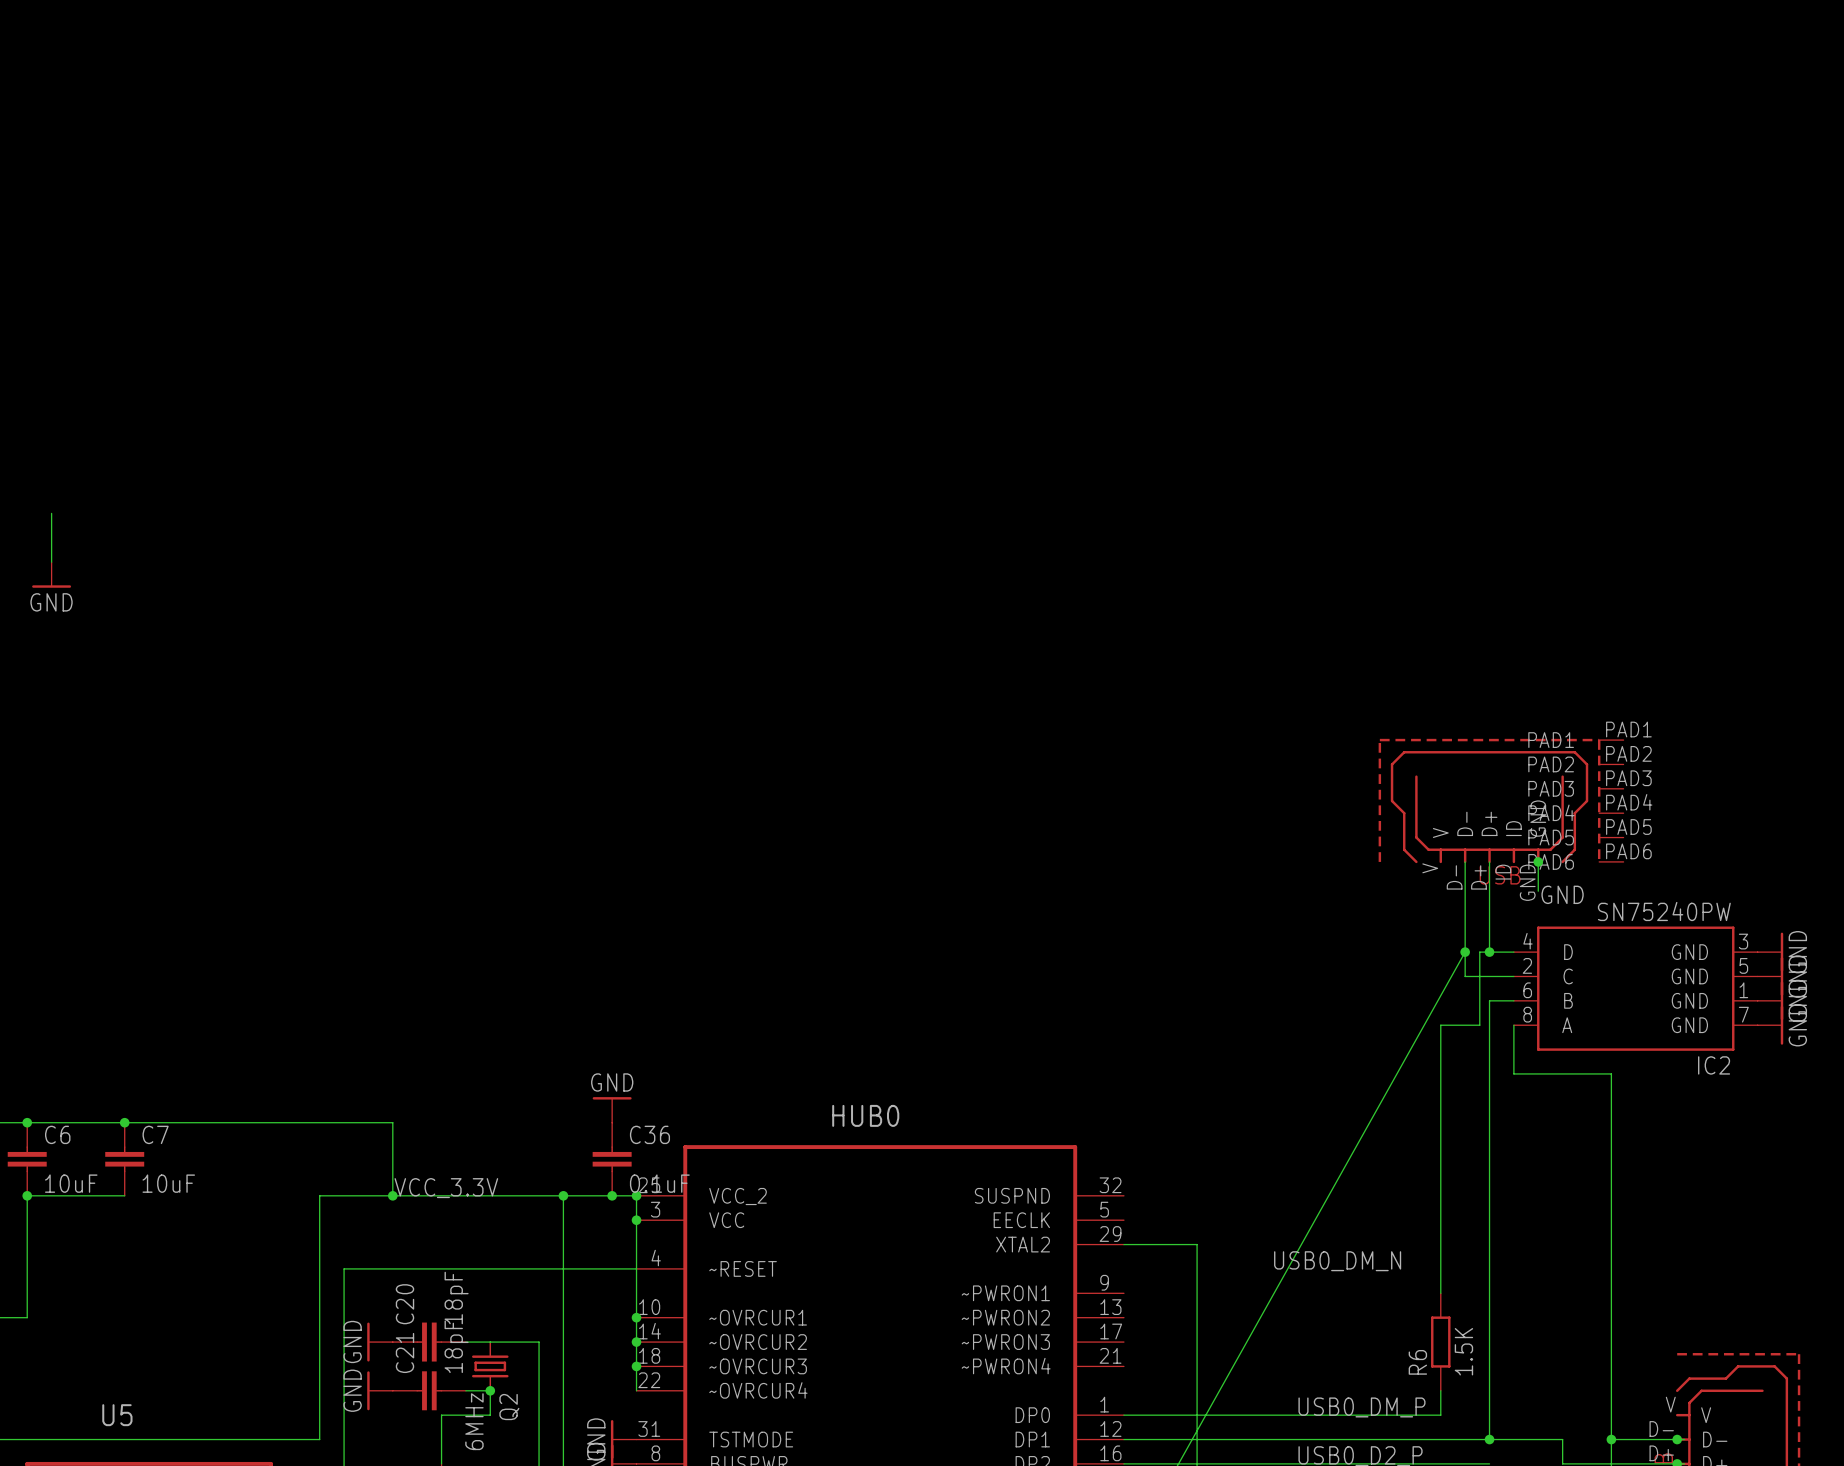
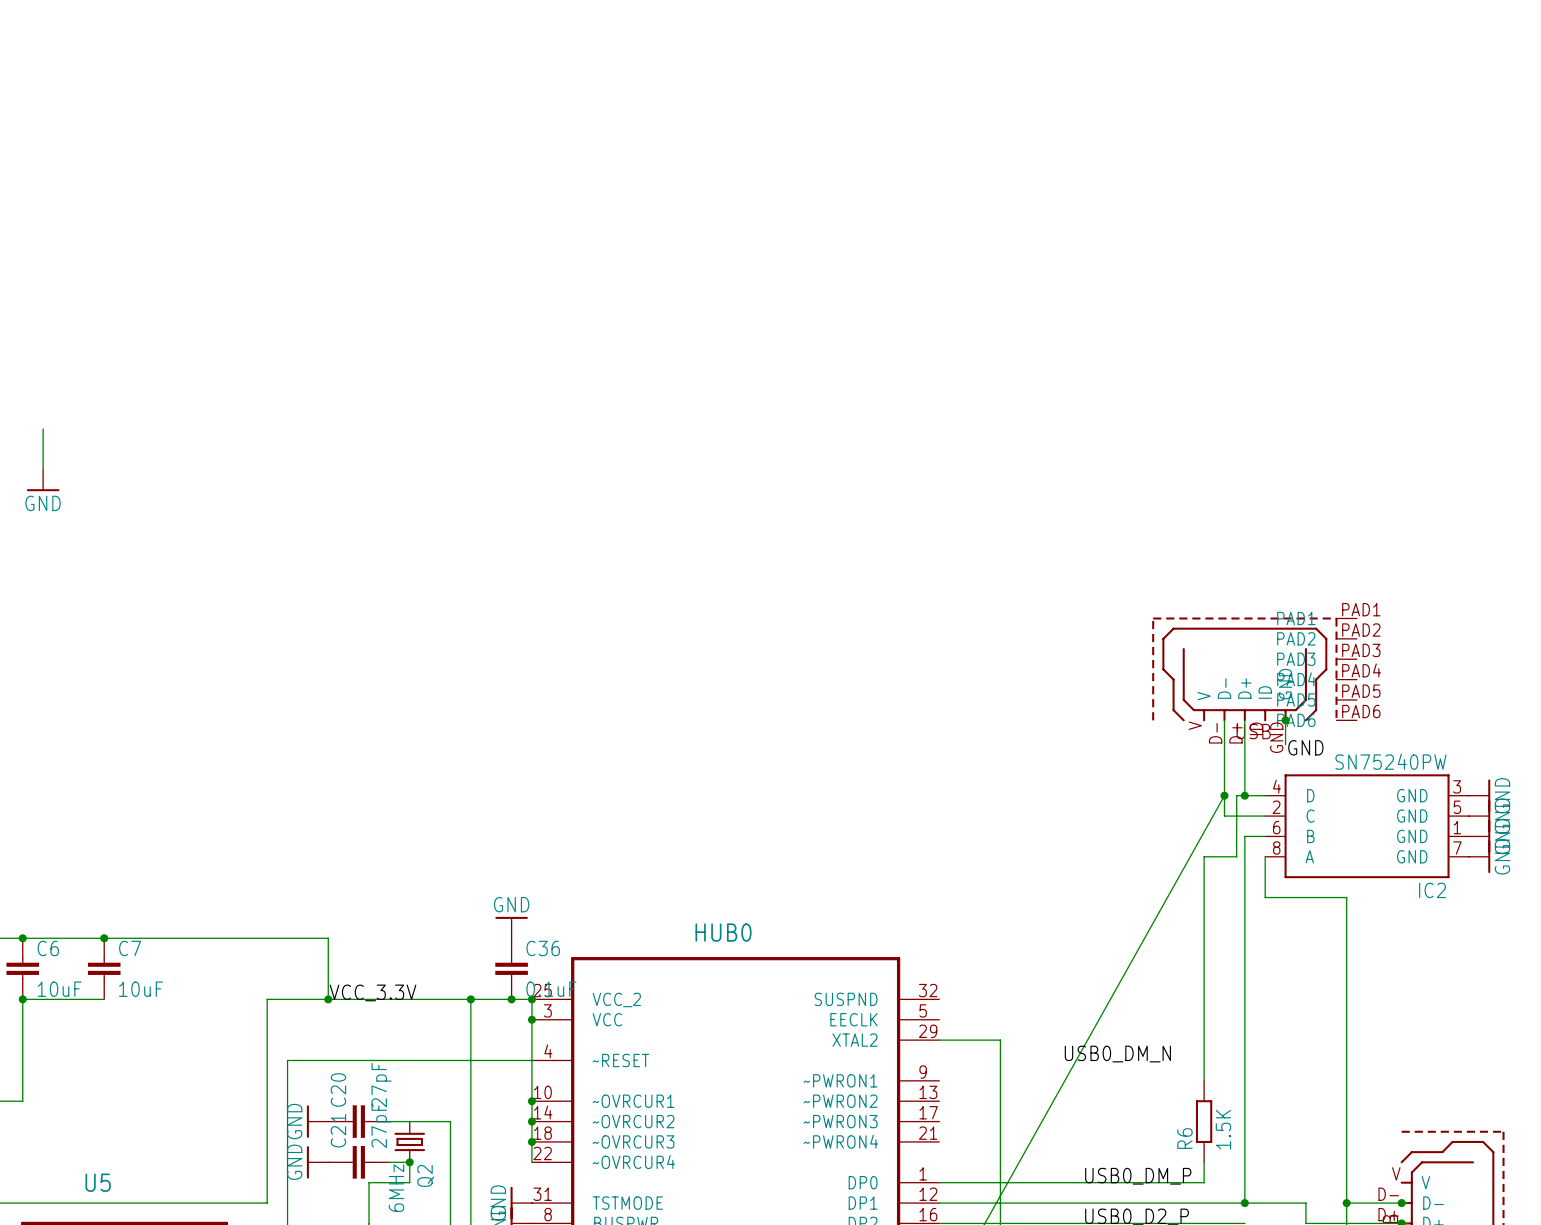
C20 value: 18pF (456, 1298) -> 27pF (381, 1085)
C21 value: 18pF (456, 1346) -> 27pF (381, 1125)

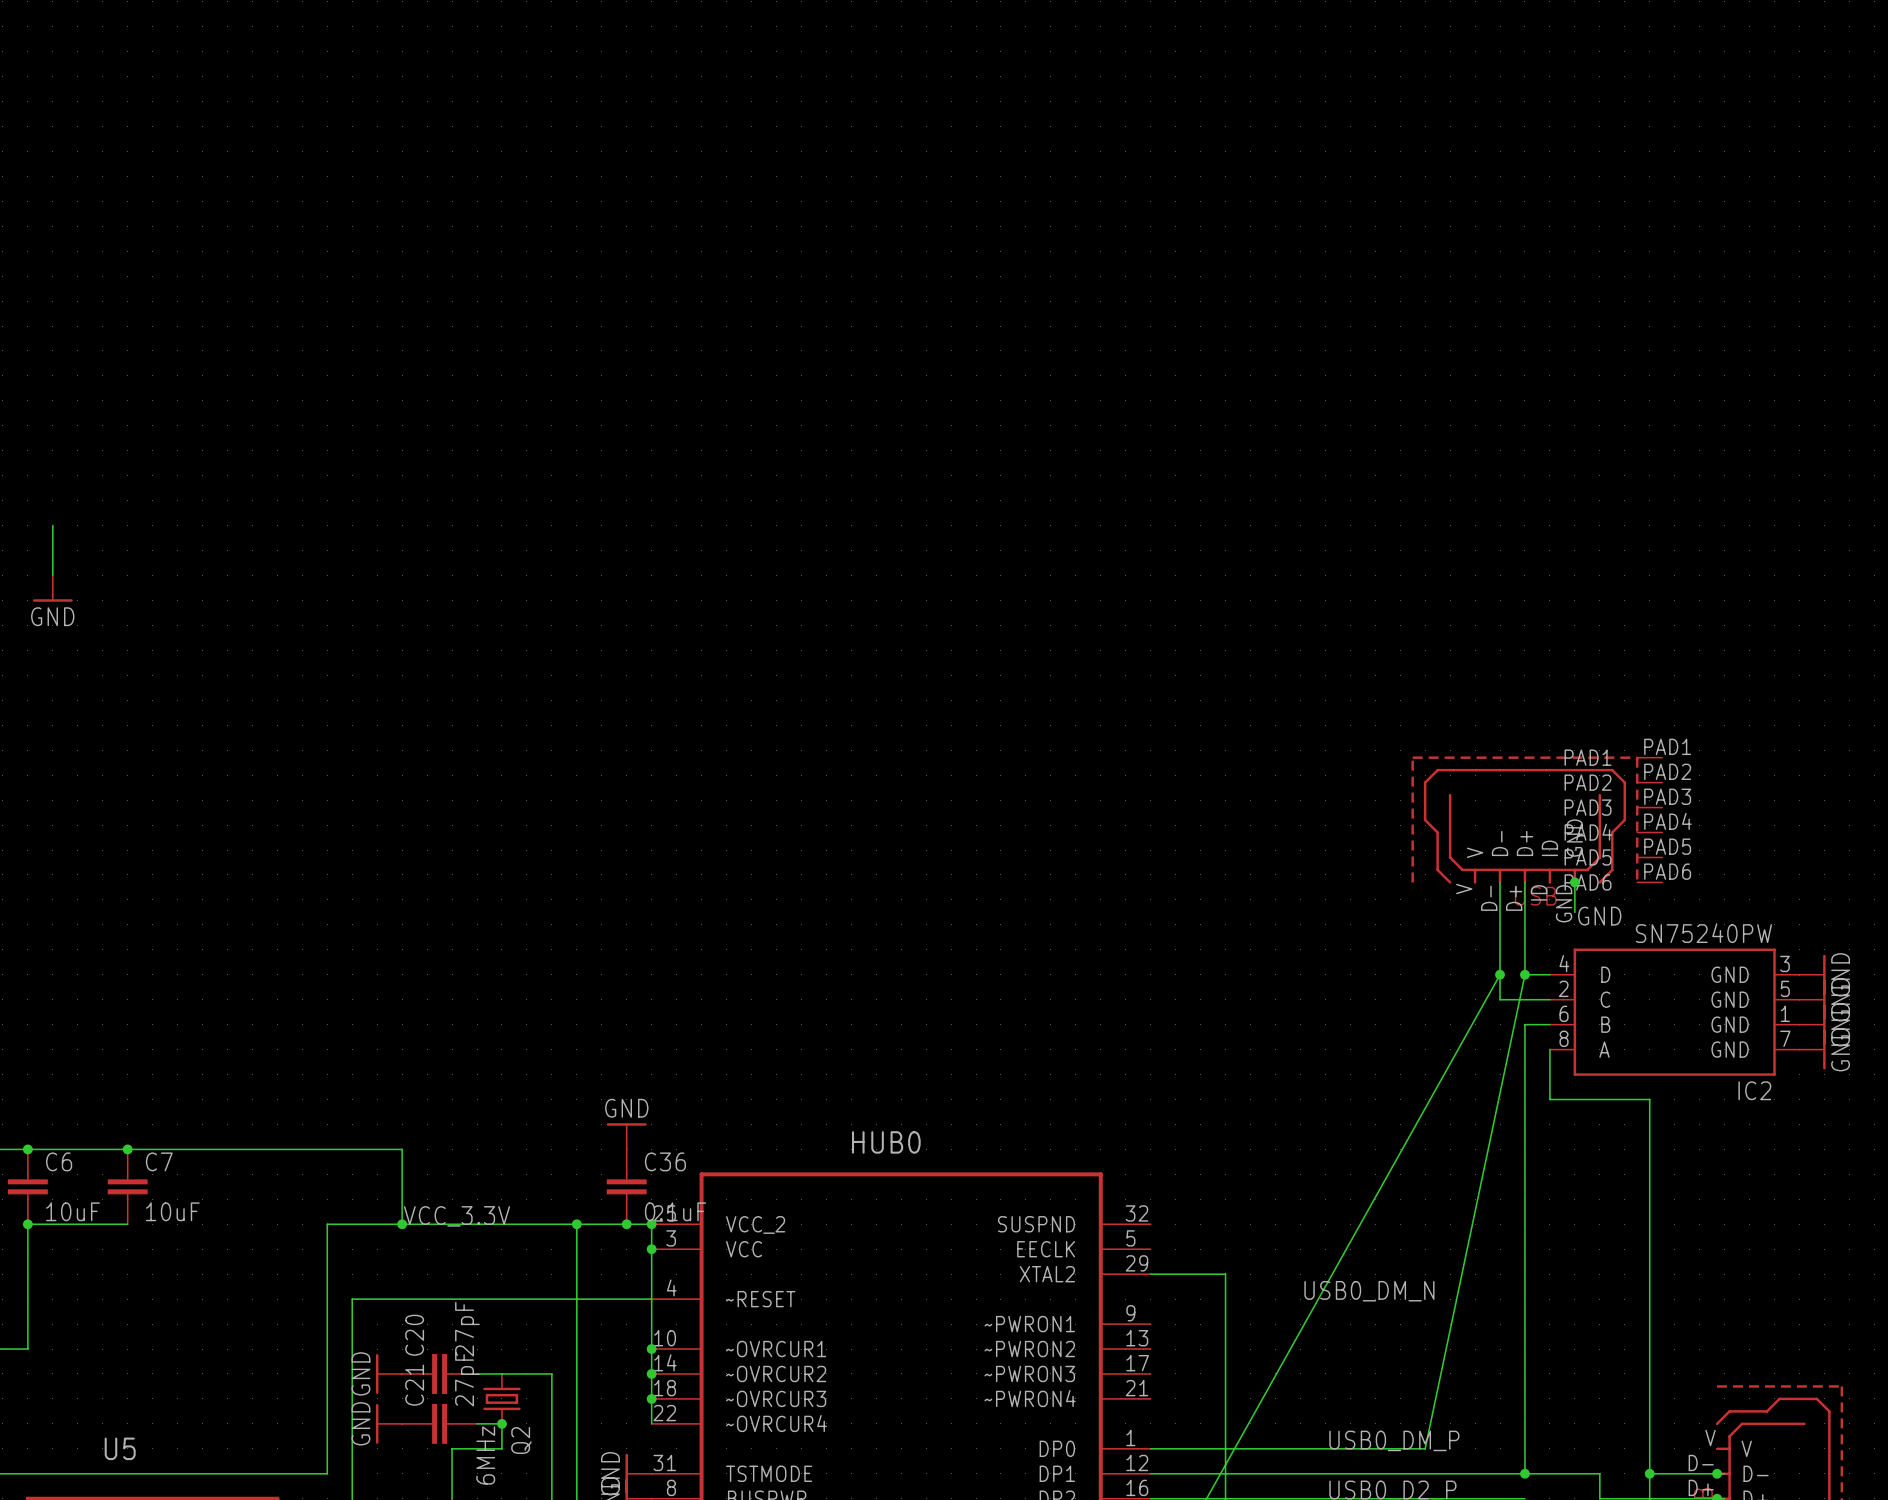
wire: (1244, 795) (1236, 795) (1236, 856) (1204, 856) (1204, 1080) -> (1524, 974) (1425, 1448)
R6: 1.5K (1204, 1121) -> none
wire: (1204, 1162) (1204, 1182) (1163, 1182) -> none

